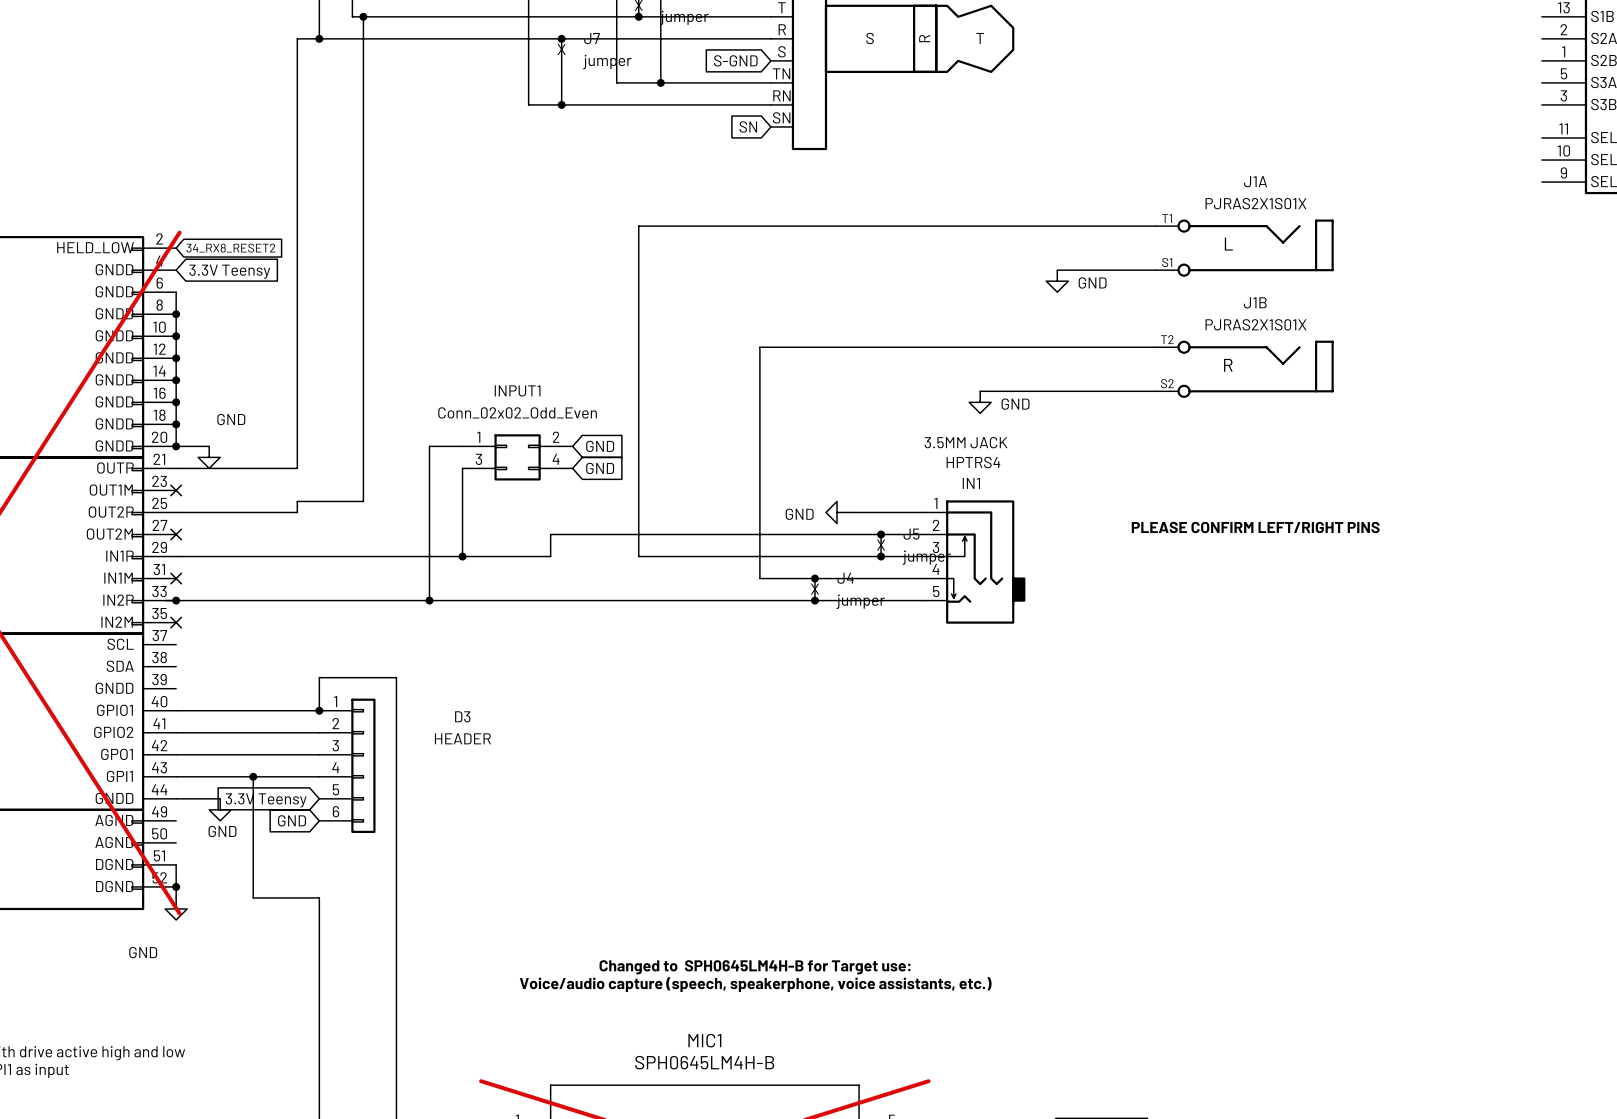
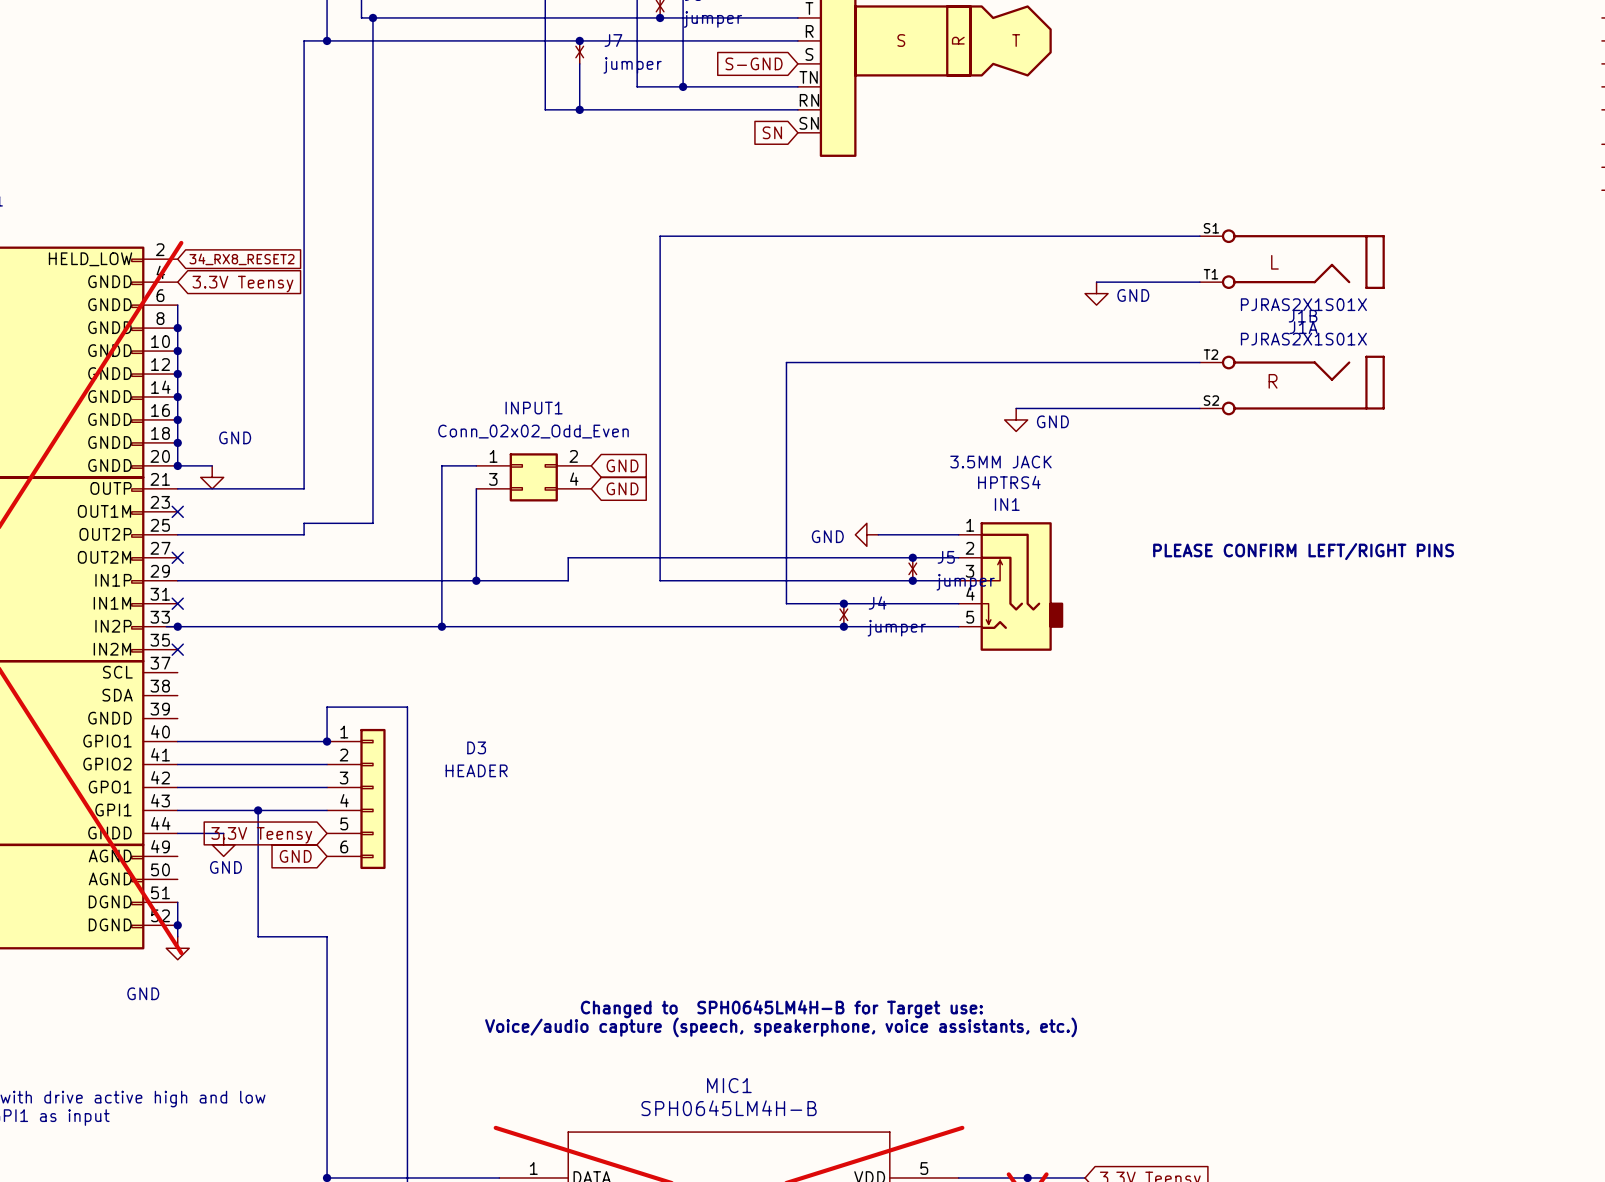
J1A flip: as is (1255, 248) -> up-down (1303, 259)

